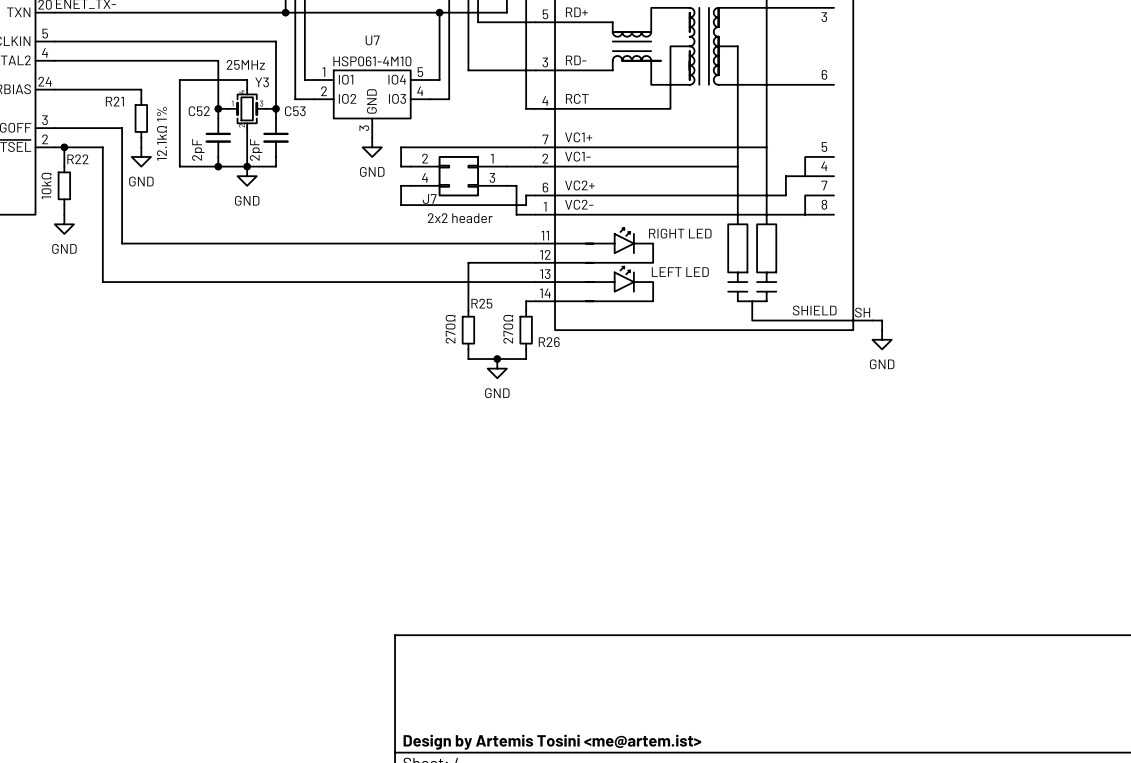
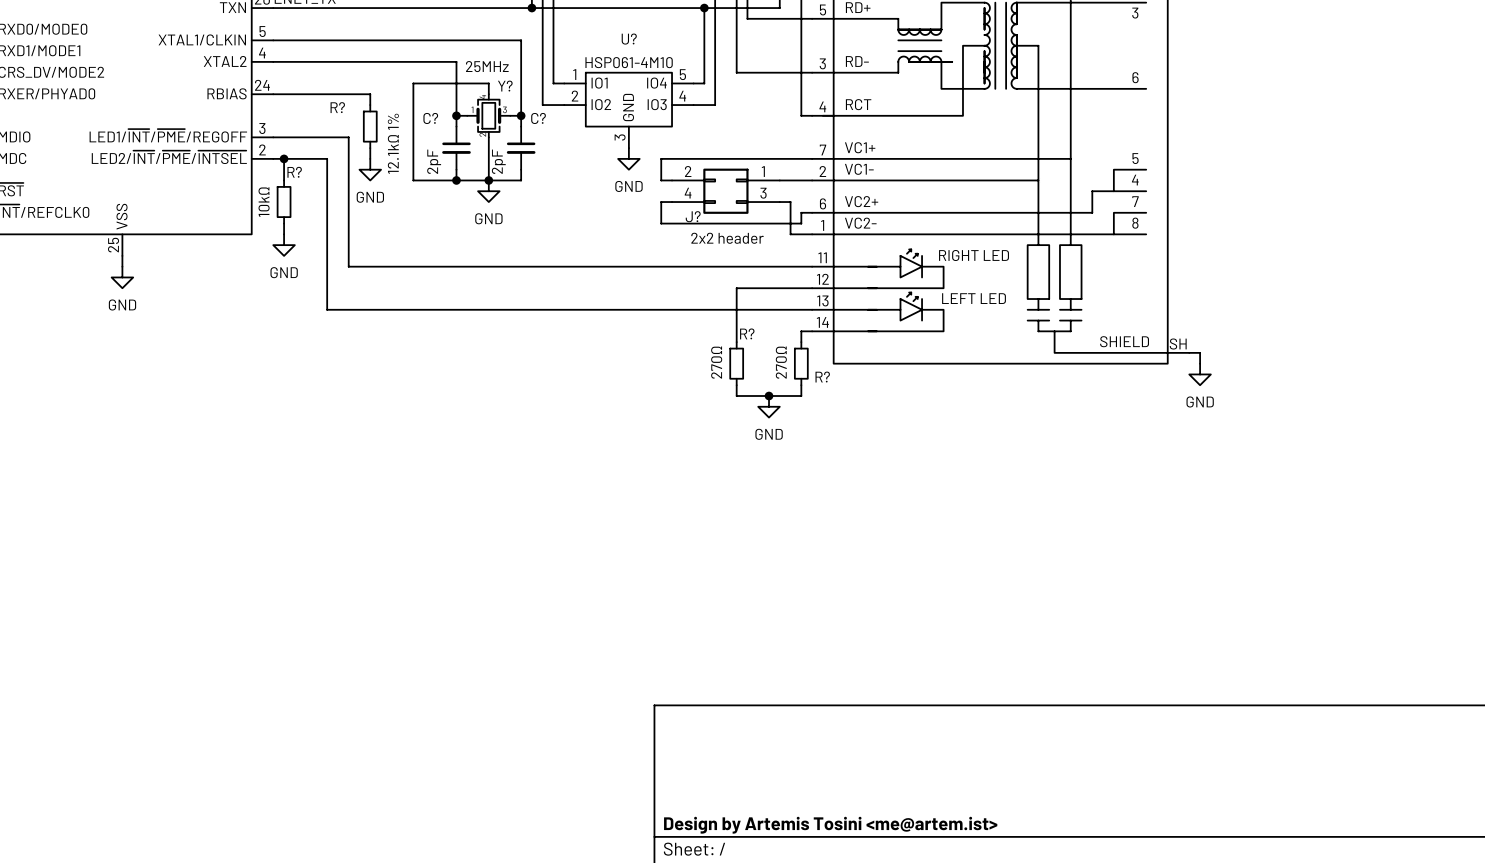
U7 name: U7 (372, 40) -> U? (629, 39)
Y3 name: Y3 (262, 82) -> Y? (505, 86)
R21 name: R21 (114, 101) -> R? (337, 107)
C52 name: C52 (199, 111) -> C? (430, 118)
C53 name: C53 (295, 111) -> C? (538, 118)
R22 name: R22 (77, 159) -> R? (294, 172)
J7 name: J7 (429, 199) -> J? (693, 216)
R25 name: R25 (481, 303) -> R? (747, 333)
R26 name: R26 (549, 342) -> R? (822, 377)

